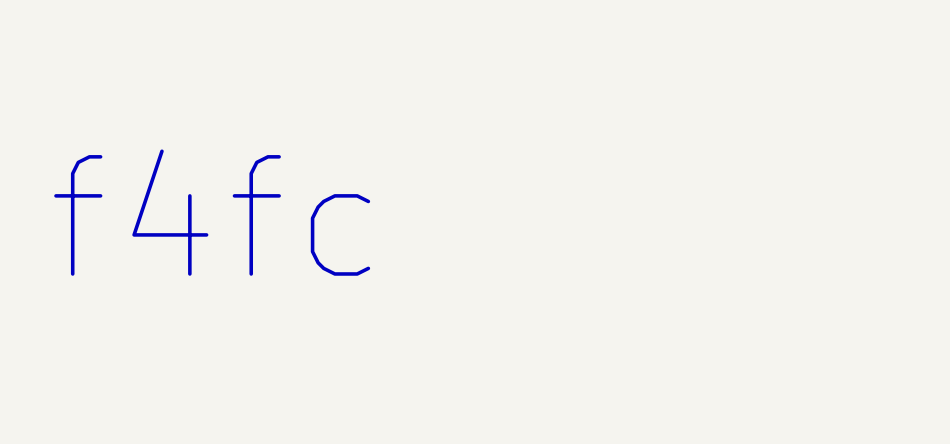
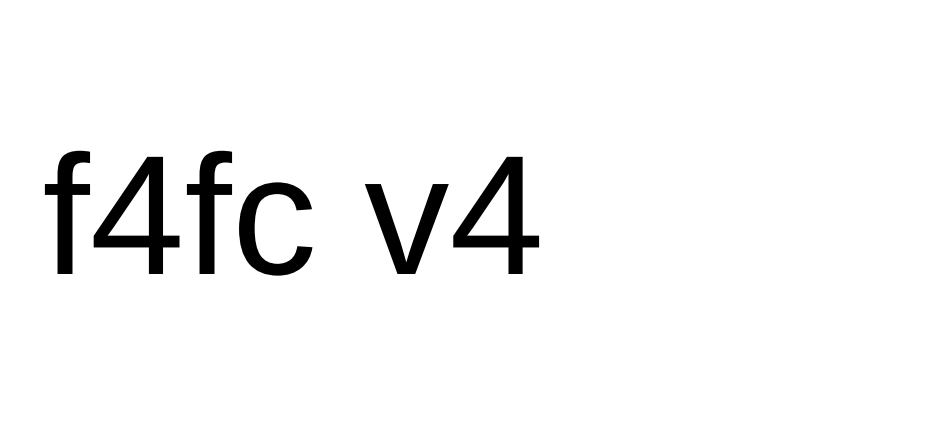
text: f4fc (212, 212) -> f4fc v4 (291, 213)

